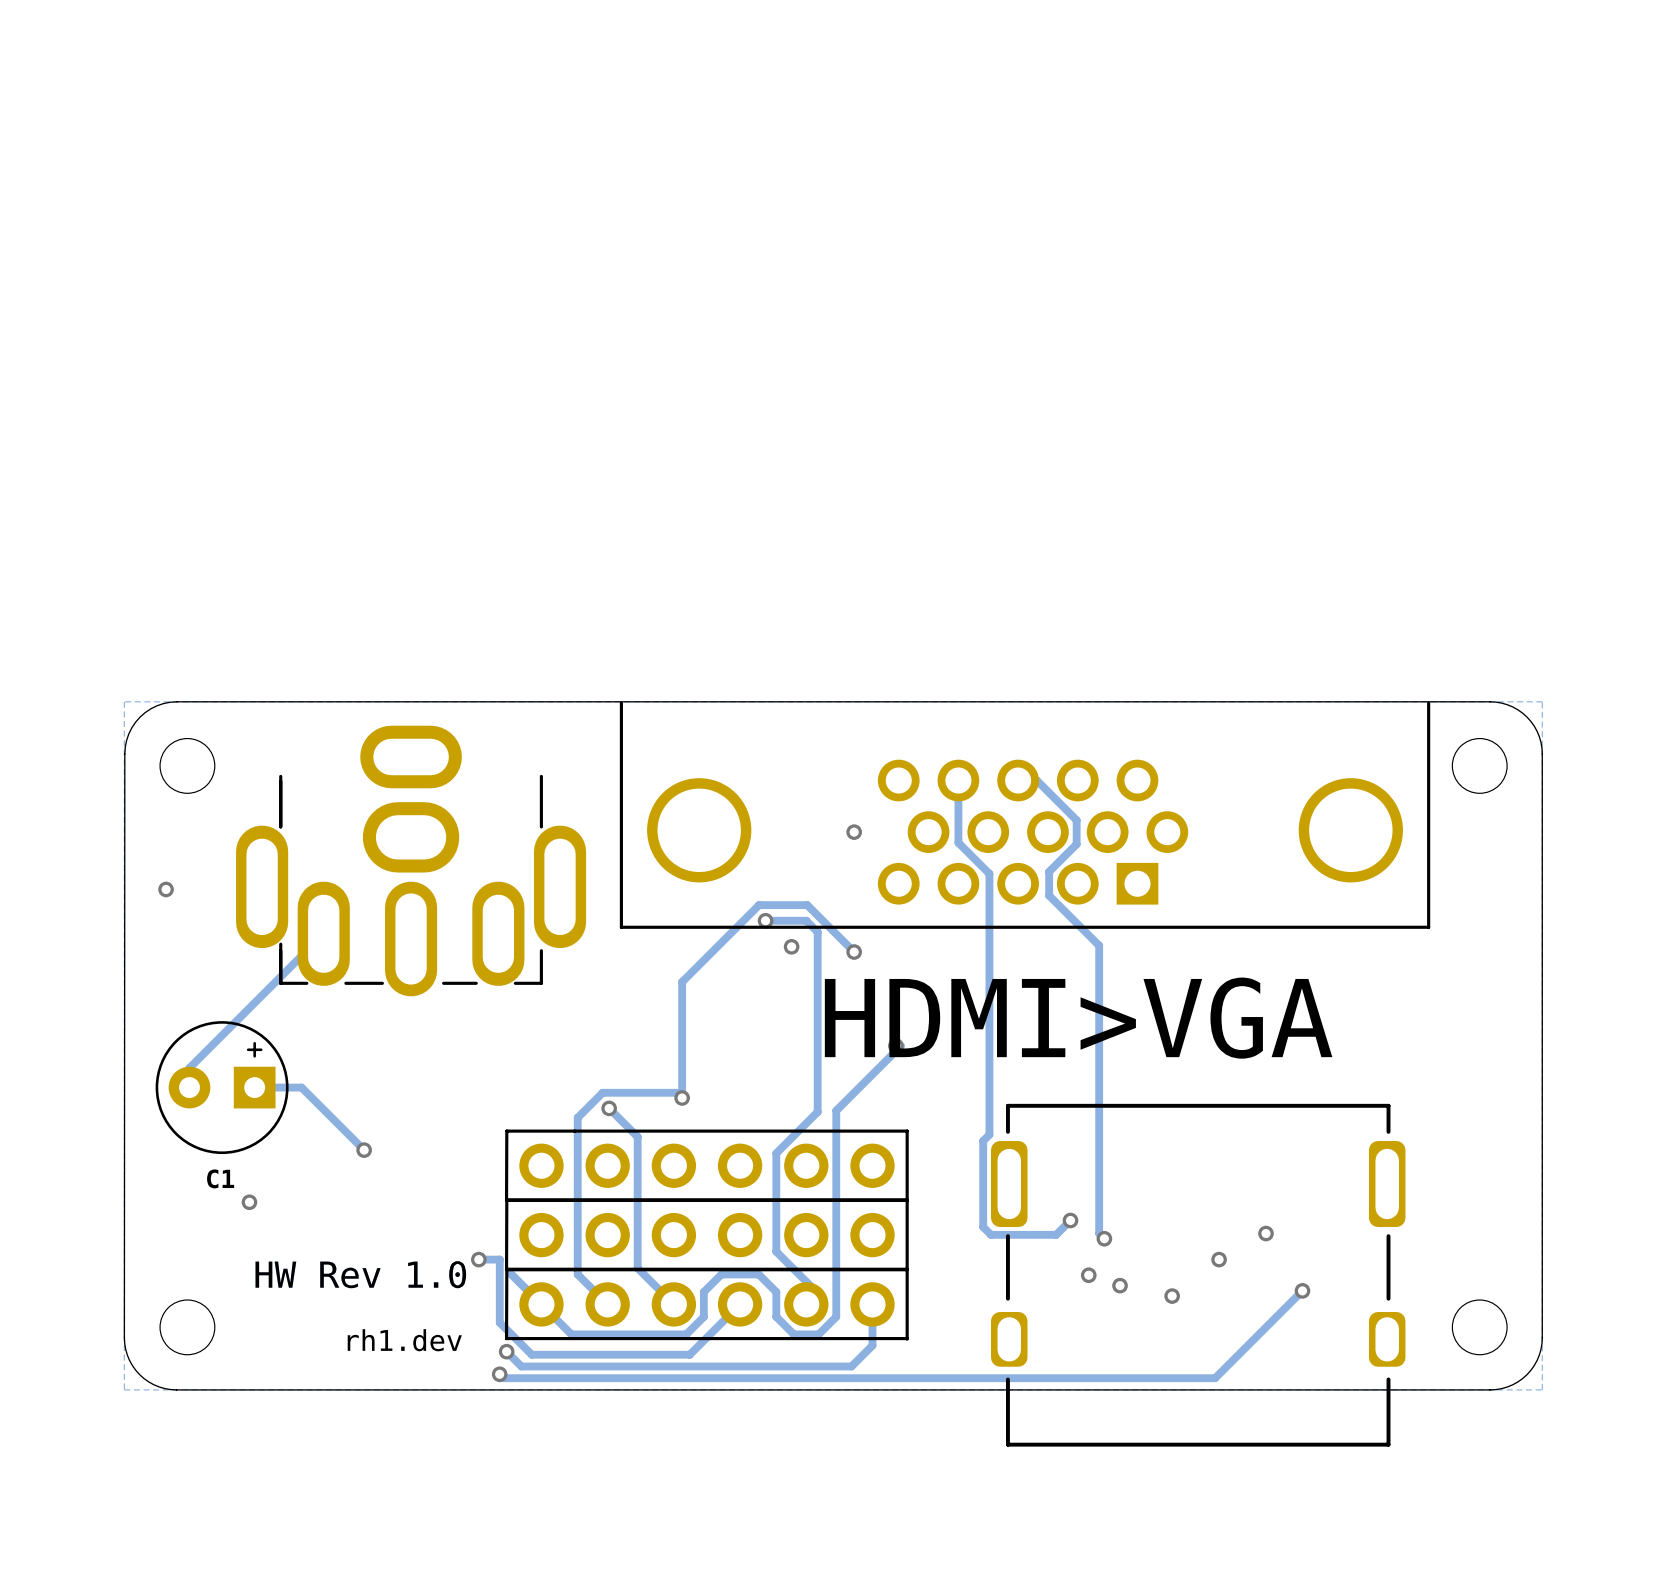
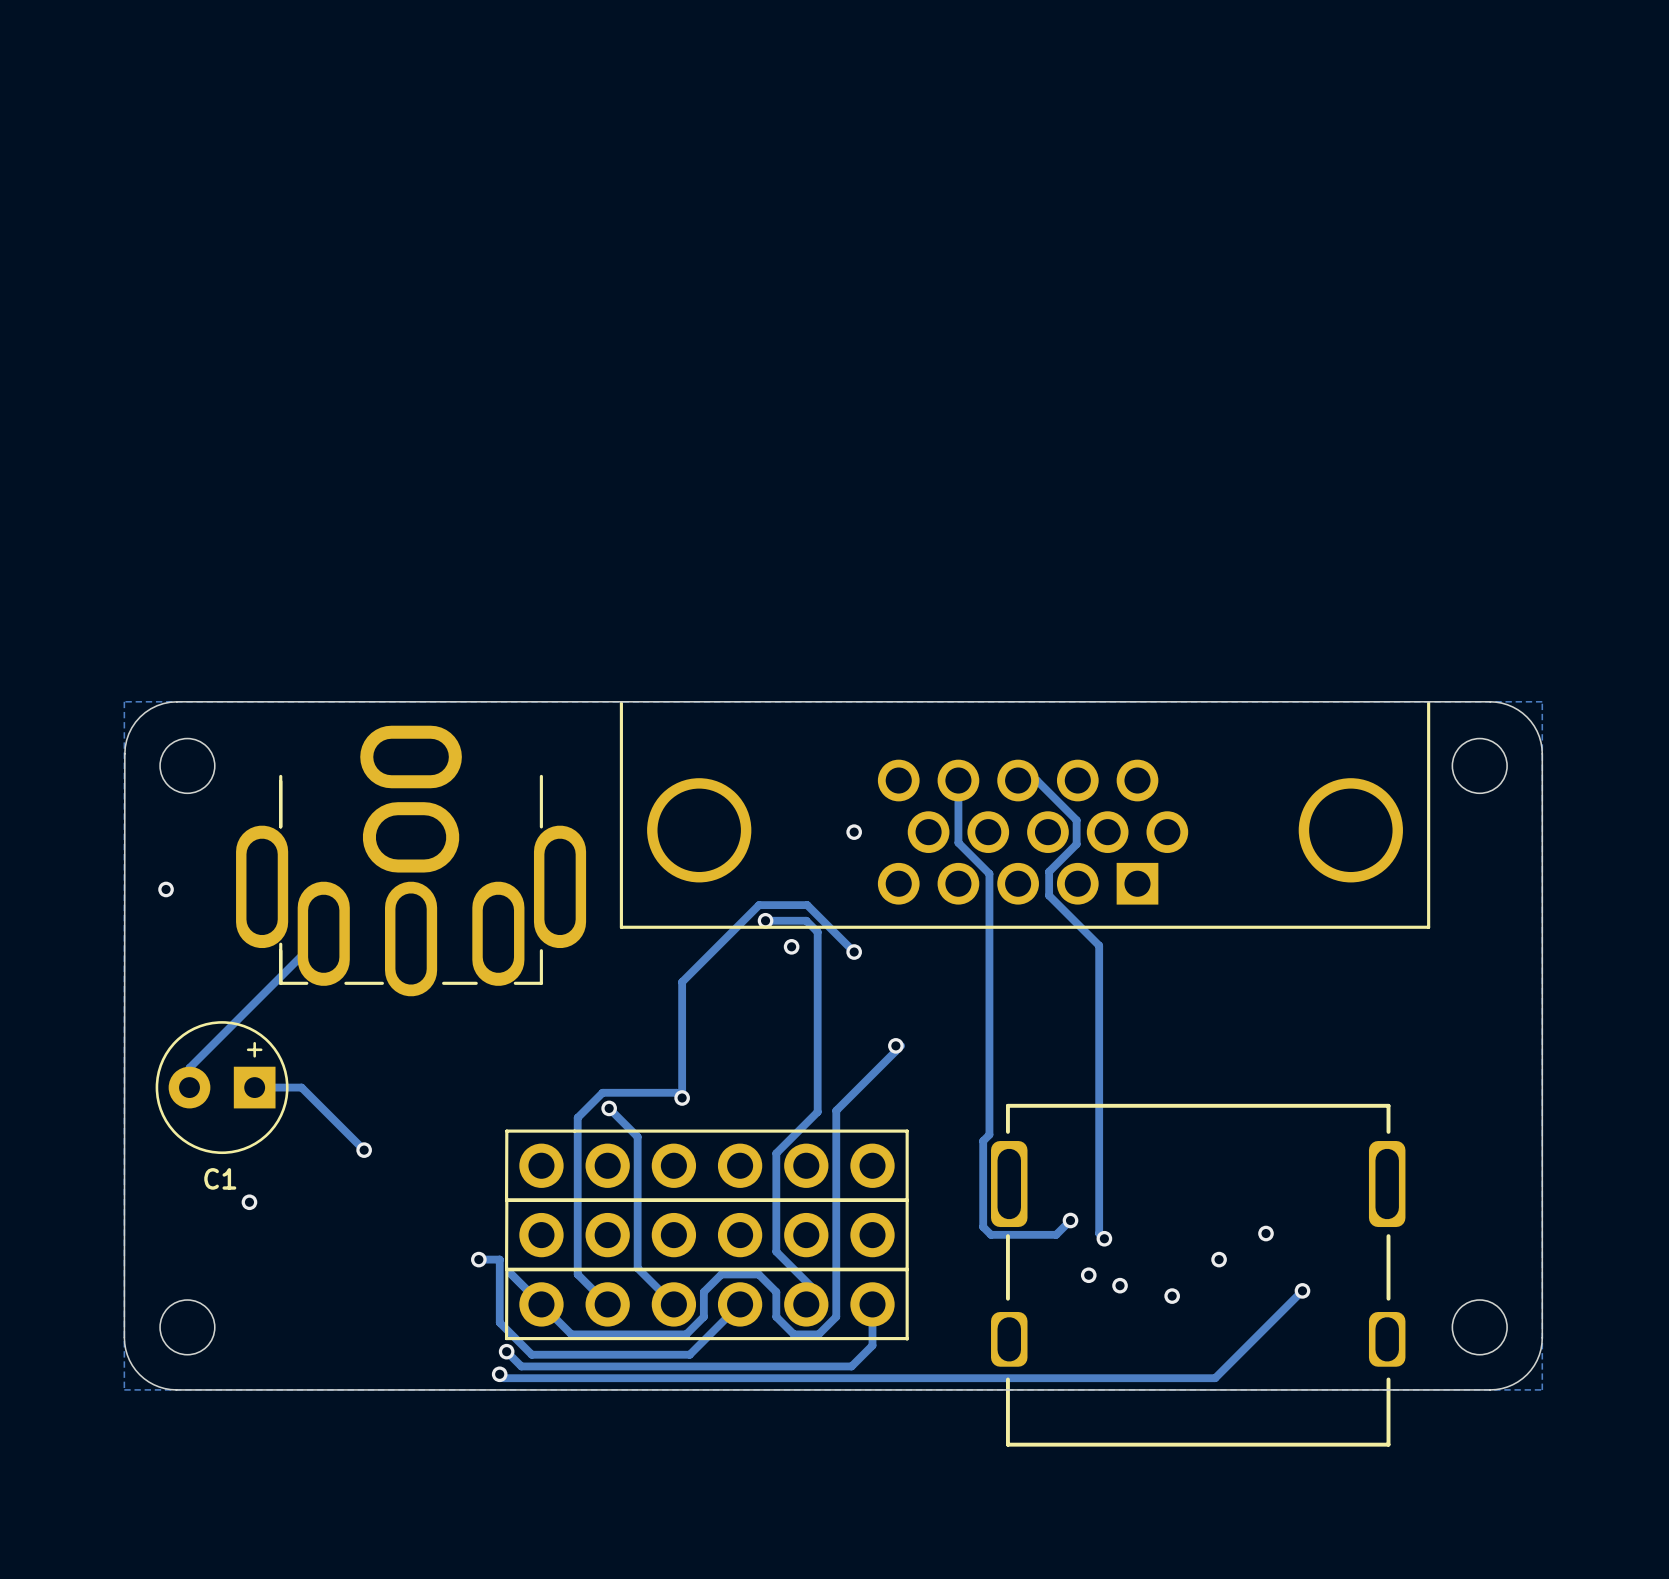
text: HDMI>VGA (1078, 1018) -> none
text: HW Rev 1.0 (360, 1274) -> none
text: rh1.dev (404, 1340) -> none

